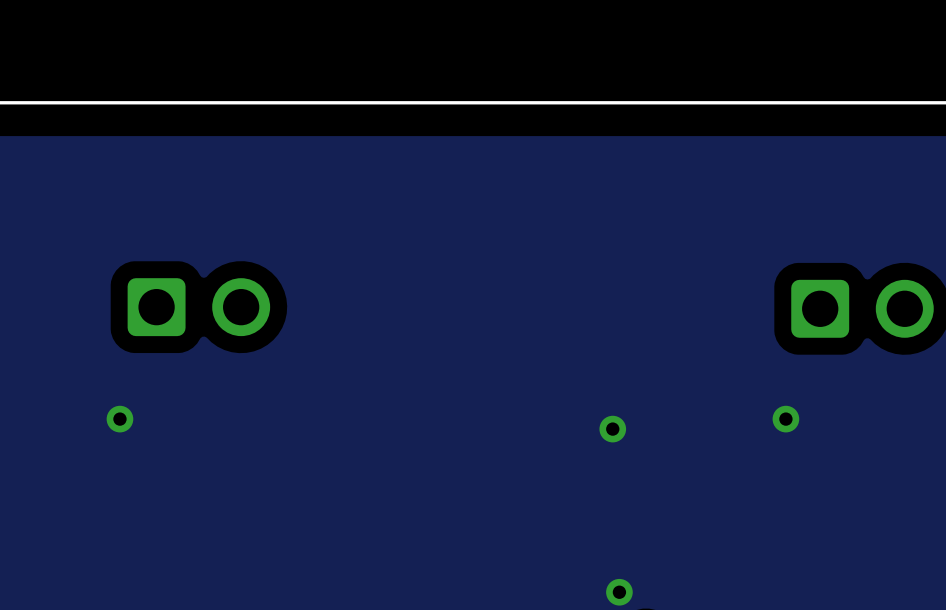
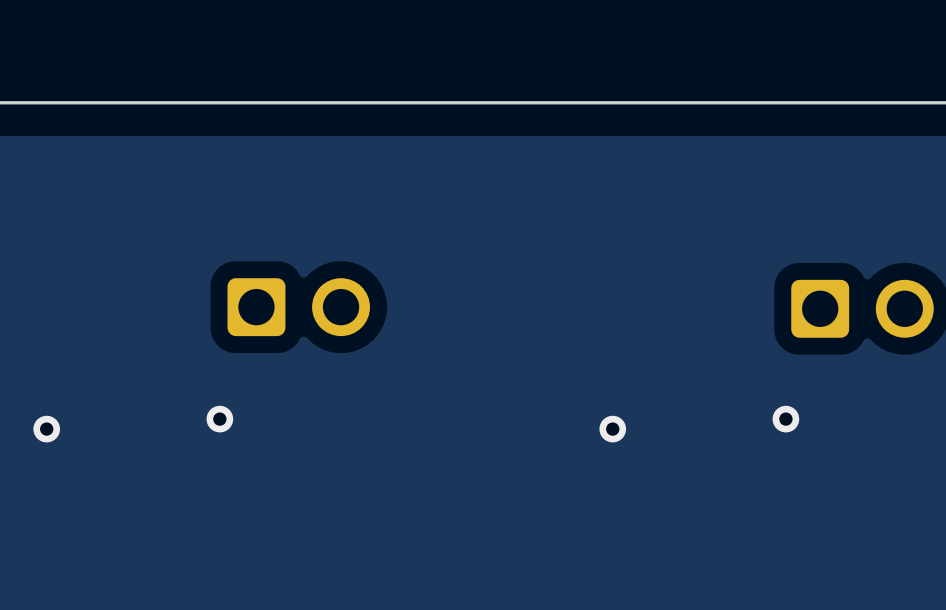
part position: (198, 307) -> (298, 307)
via: (119, 419) -> none
via: none -> (219, 419)
via: none -> (46, 429)
via: (619, 592) -> none

